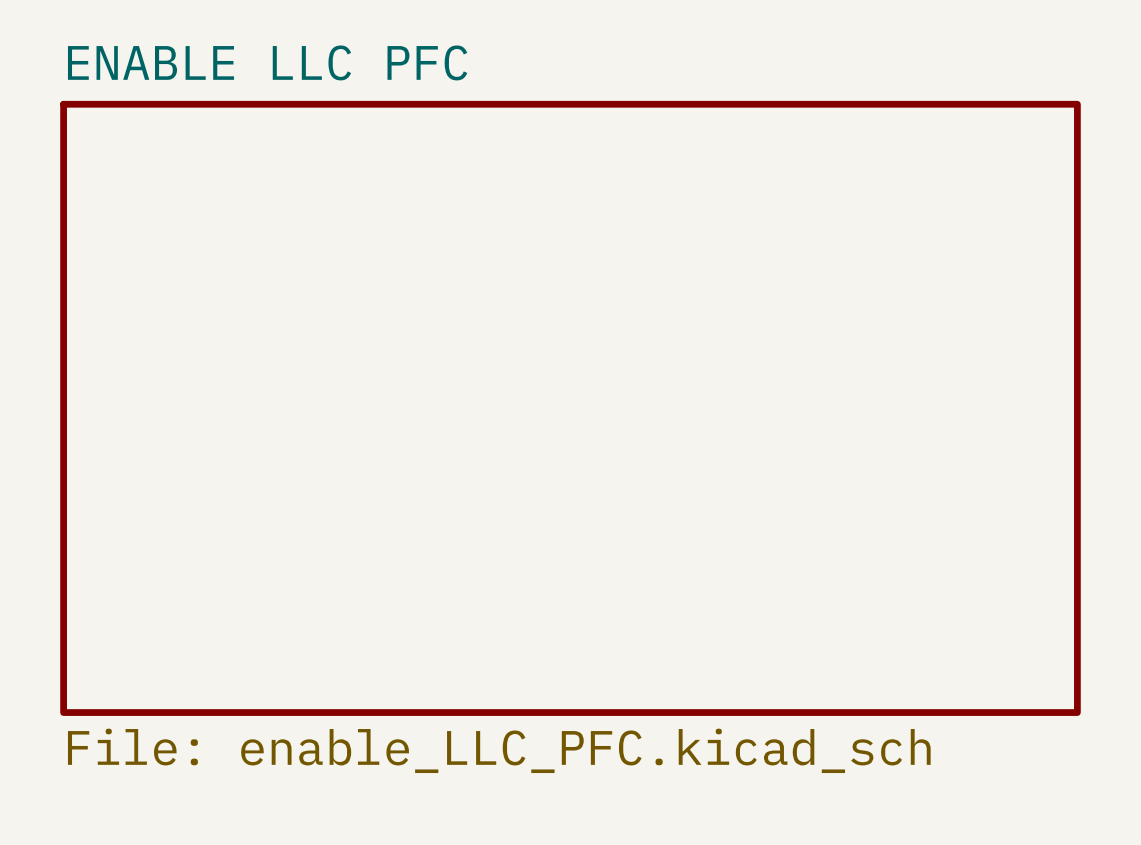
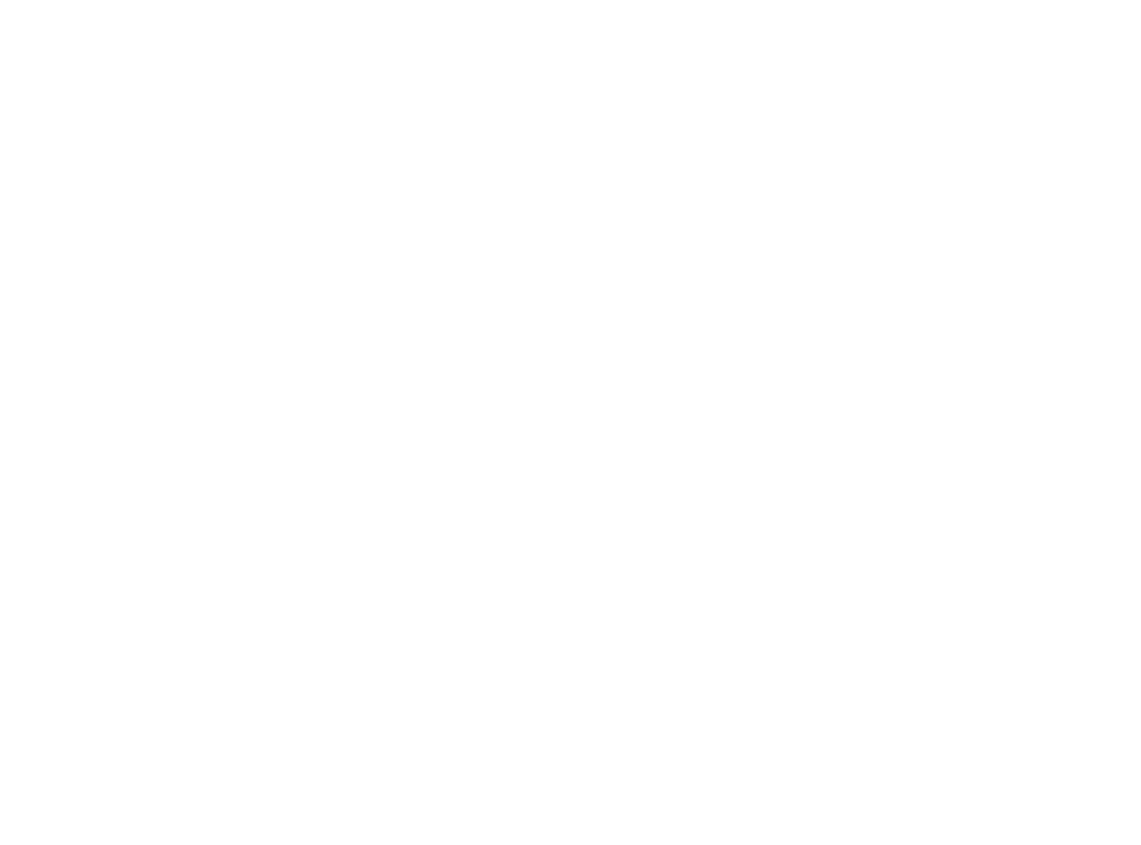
sheet ENABLE LLC PFC: File: enable_LLC_PFC.kicad_sch (570, 408) -> none

